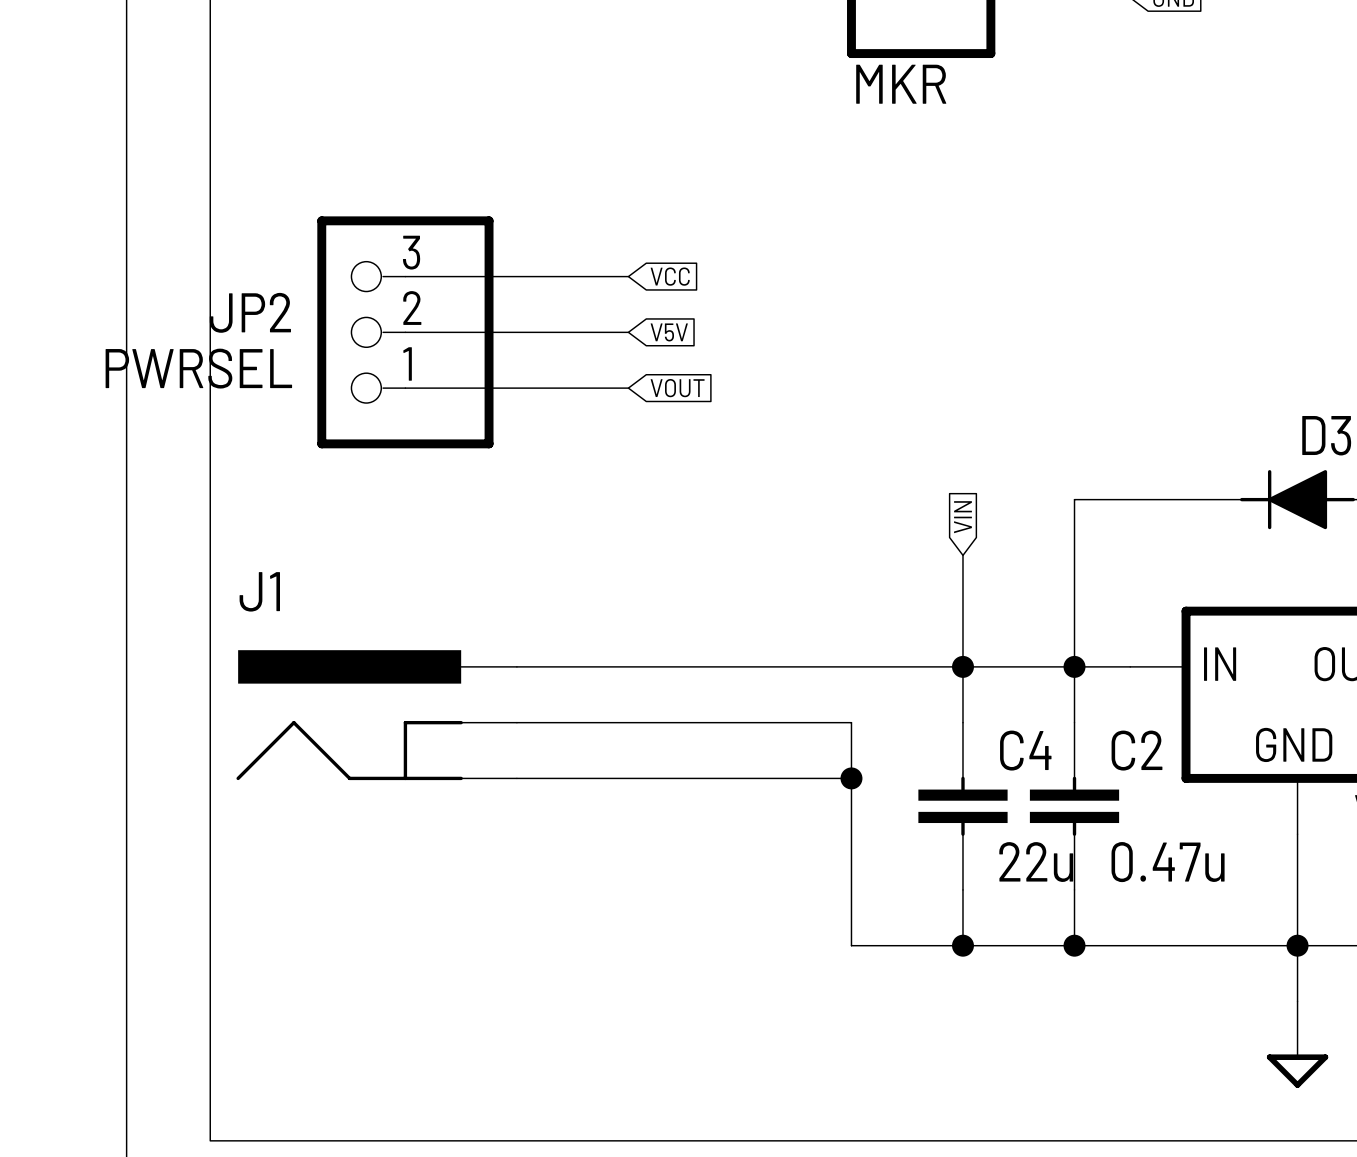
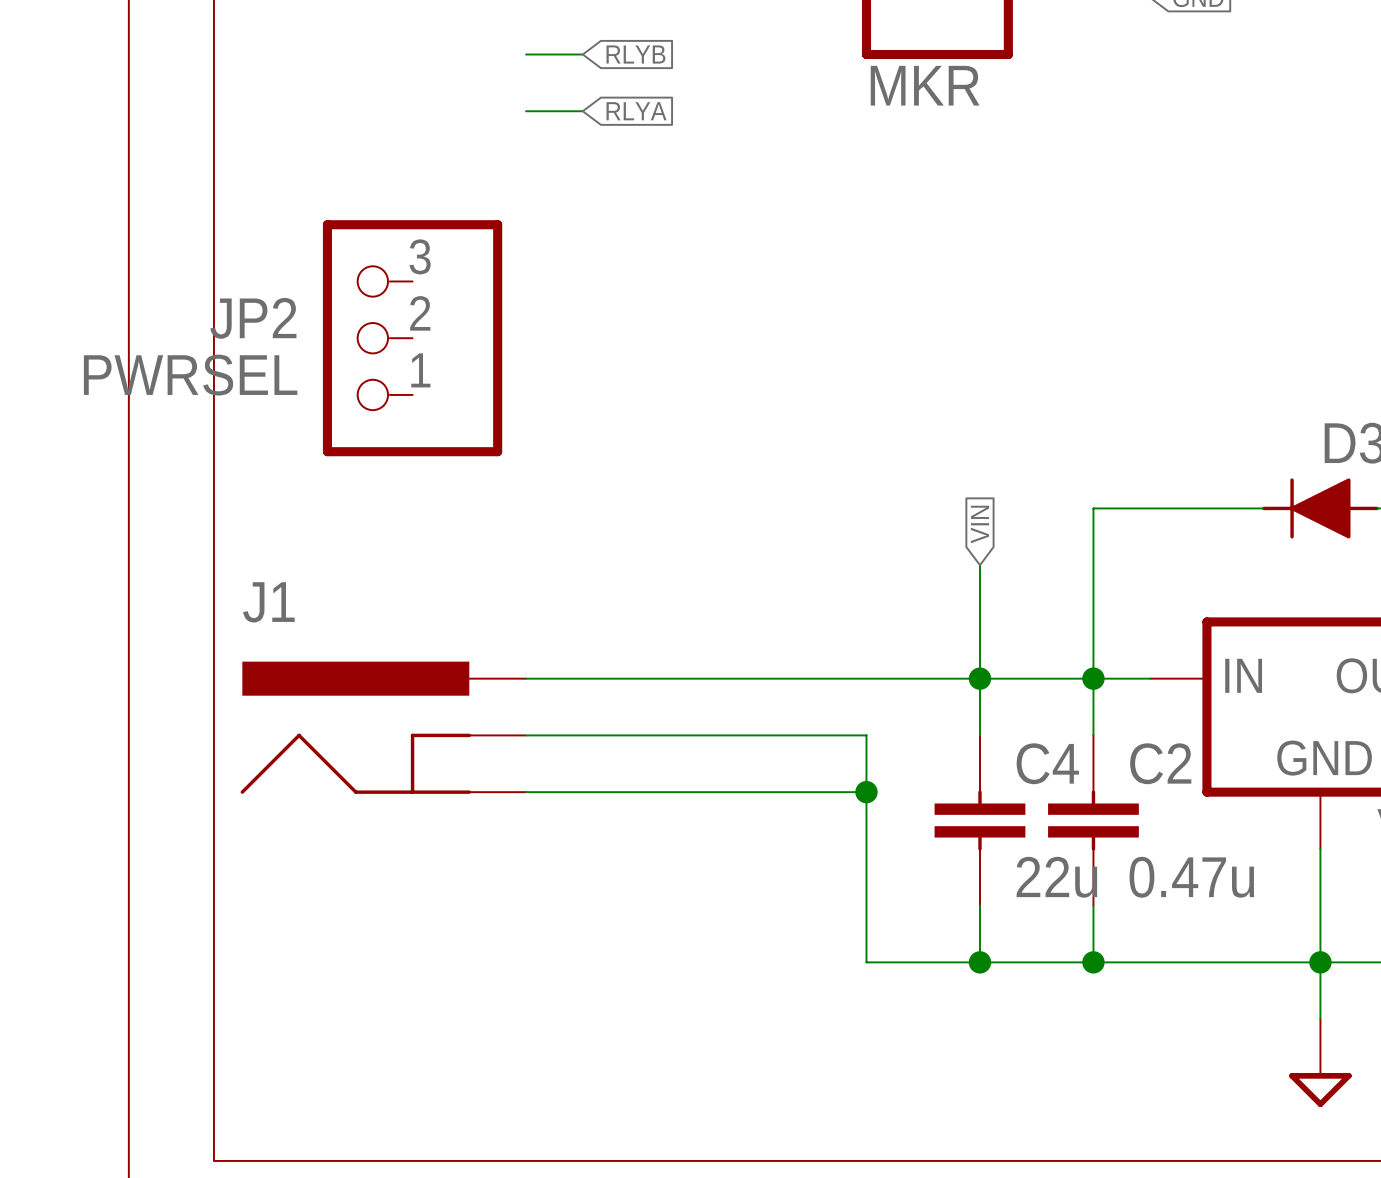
wire: none -> (526, 54) (582, 54)
global label: none -> RLYB (635, 54)
wire: none -> (526, 111) (582, 111)
global label: none -> RLYA (636, 111)
wire: (405, 276) (628, 276) -> none
global label: VCC (670, 276) -> none
wire: (405, 332) (628, 332) -> none
global label: V5V (669, 332) -> none
wire: (405, 388) (628, 388) -> none
global label: VOUT (677, 388) -> none

